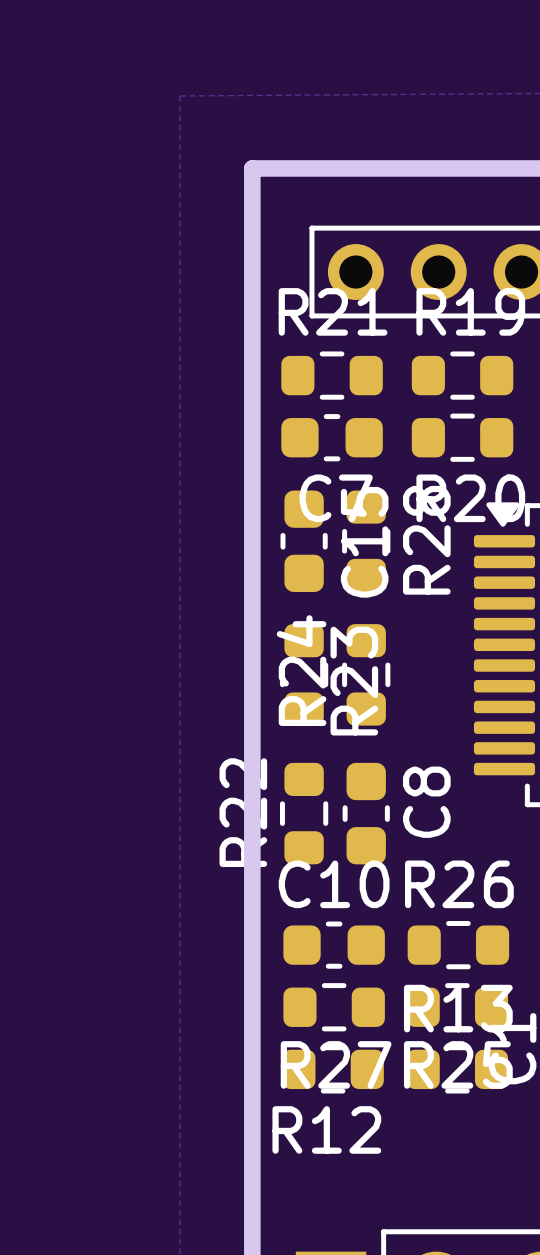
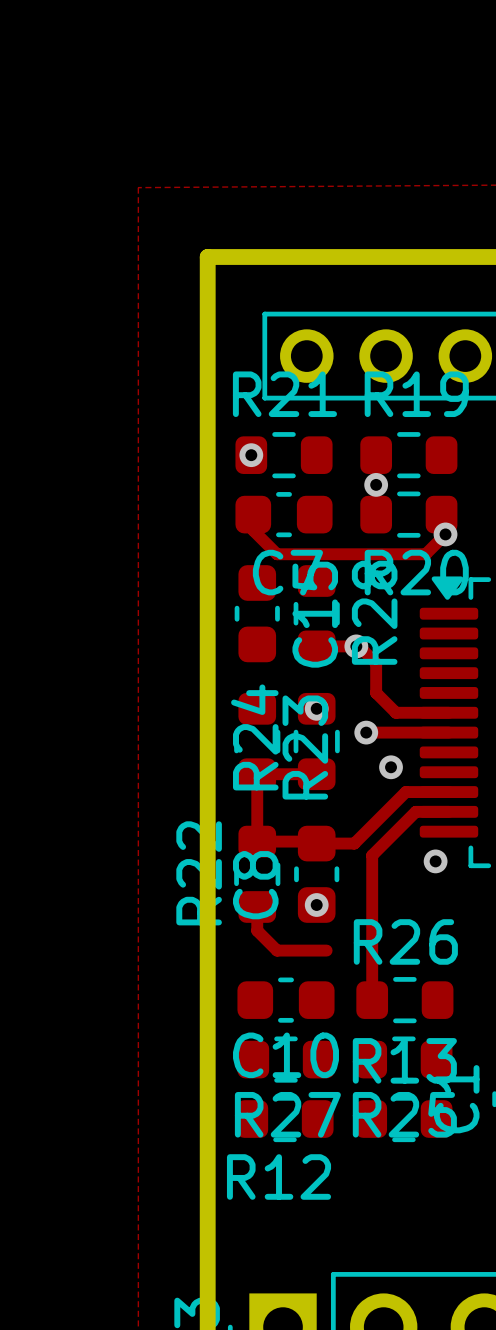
via: none -> (251, 455)
via: none -> (376, 484)
track: none -> (253, 514) (253, 530) (277, 554) (425, 554) (445, 534)
via: none -> (445, 534)
via: none -> (356, 646)
track: none -> (316, 656) (326, 646) (359, 646) (376, 663) (376, 692) (395, 712) (448, 712)
via: none -> (316, 708)
track: none -> (366, 732) (448, 732)
via: none -> (366, 732)
via: none -> (391, 767)
track: none -> (316, 774) (257, 774) (257, 841) (354, 843) (405, 792) (448, 792)
track: none -> (448, 811) (415, 811) (372, 855) (372, 1000)
via: none -> (435, 861)
C8 name position: C8 (426, 802) -> C8 (255, 885)
via: none -> (316, 905)
track: none -> (257, 906) (257, 930) (277, 950) (326, 950)
C10 name position: C10 (334, 884) -> C10 (285, 1055)

